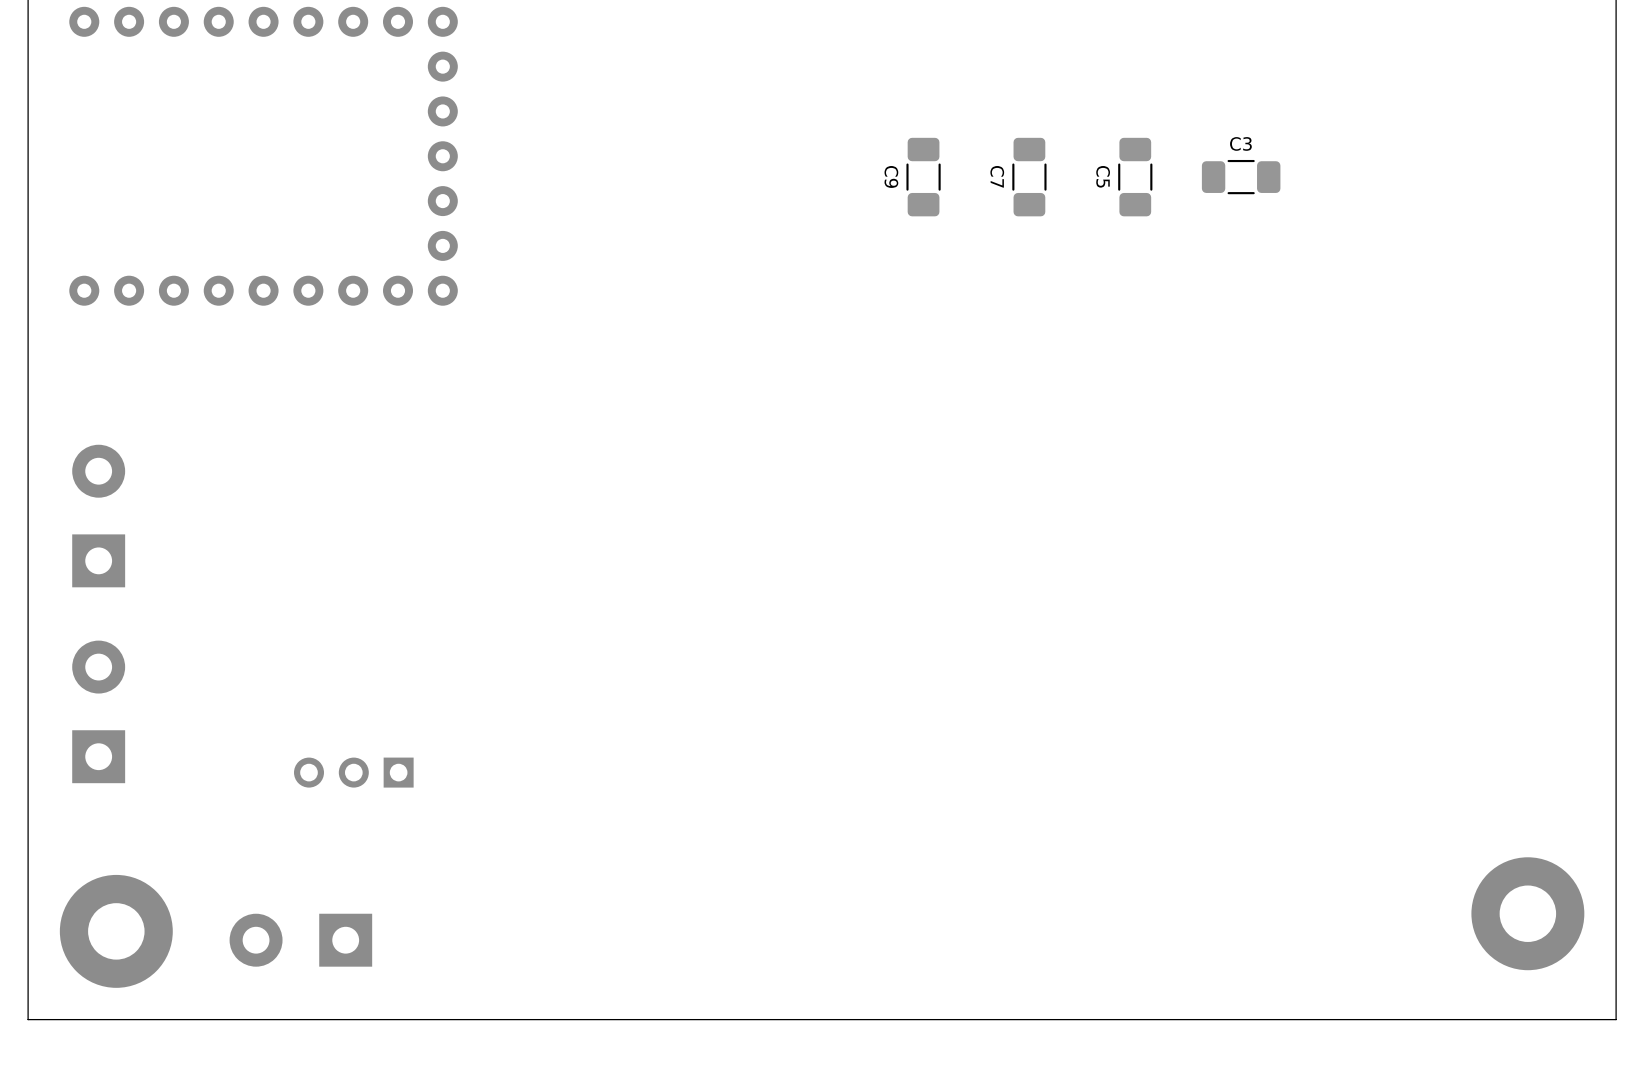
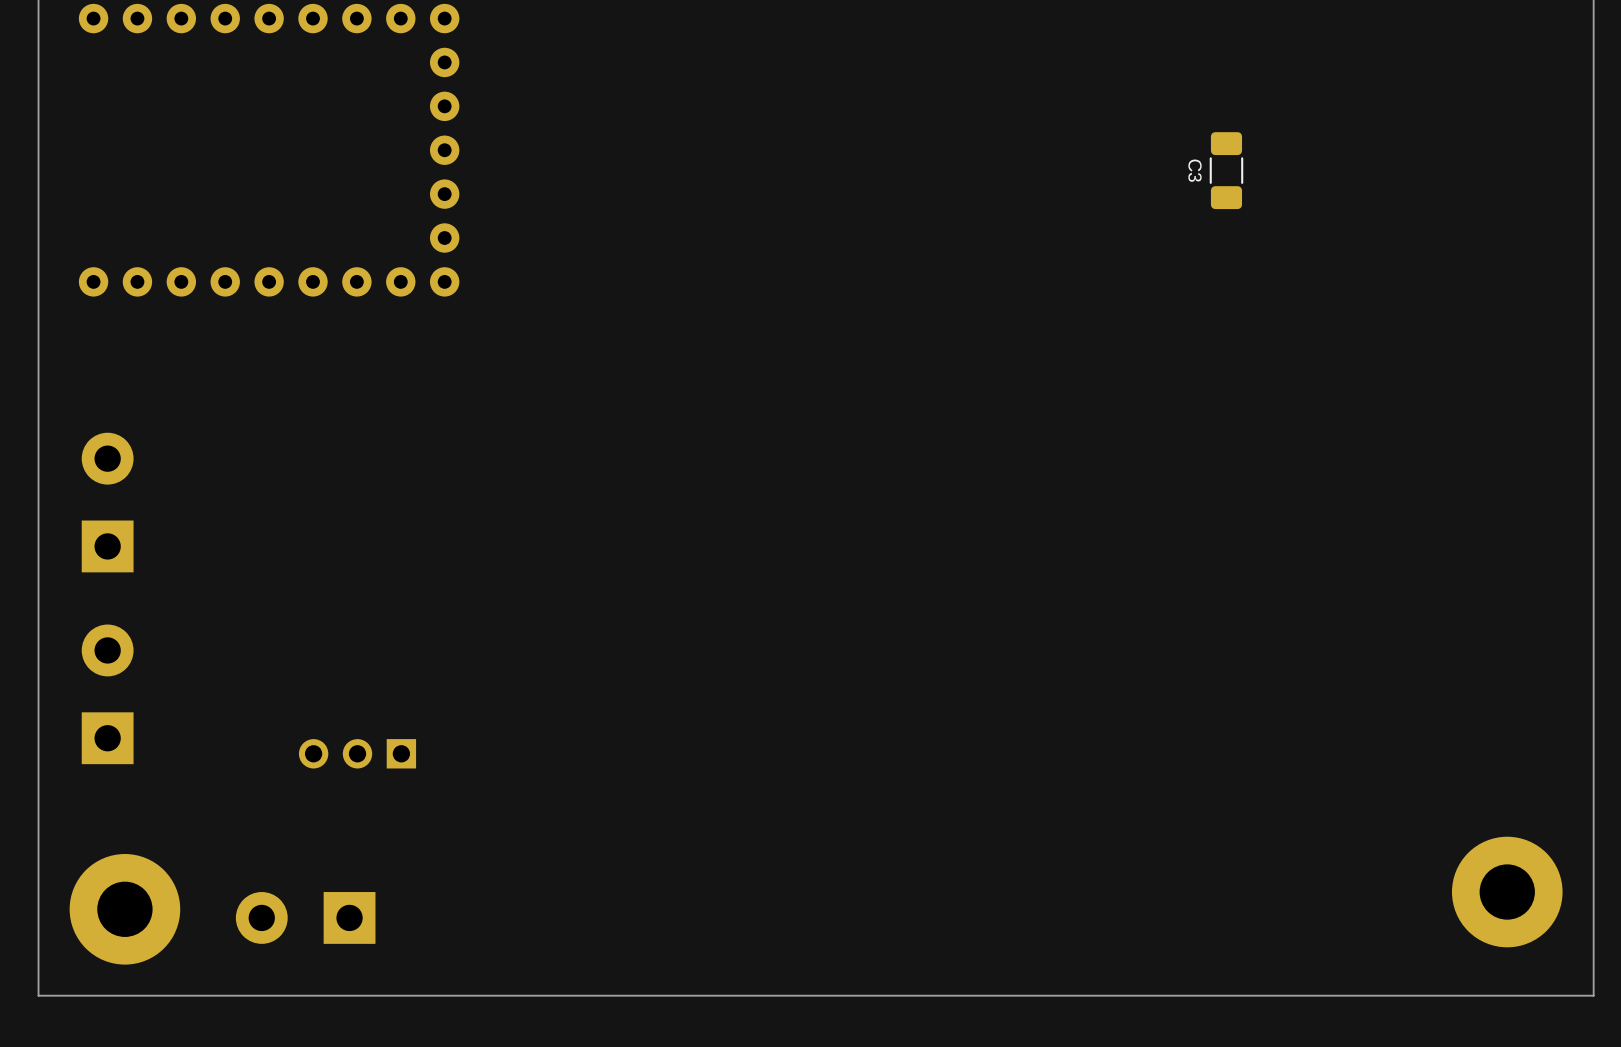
C3 name position: C3 (1240, 143) -> C3 (1195, 170)
C9: (923, 177) -> none
C7: (1029, 177) -> none
C5: (1135, 177) -> none
C3 rotation: 0° (1241, 177) -> 90° clockwise (1226, 170)

